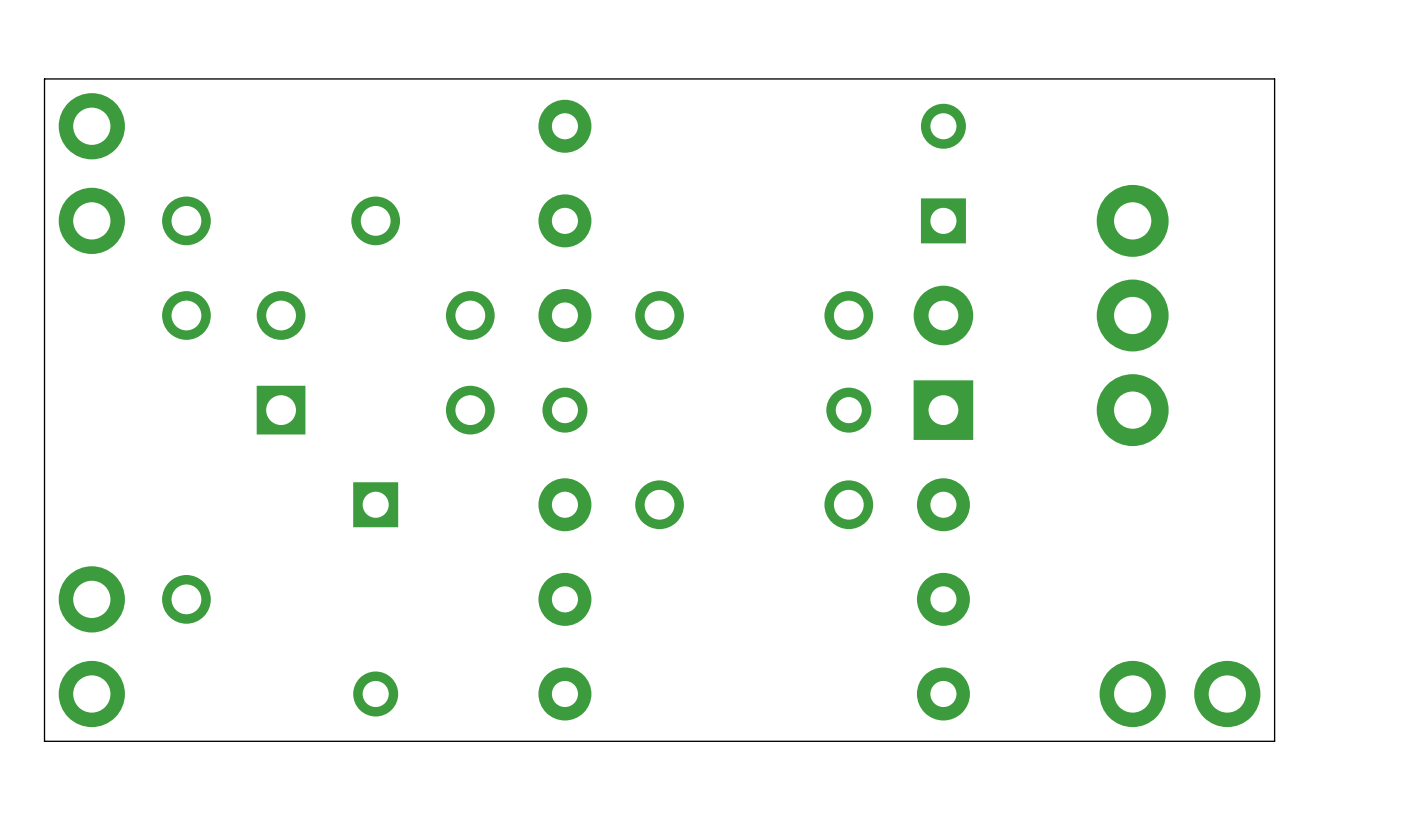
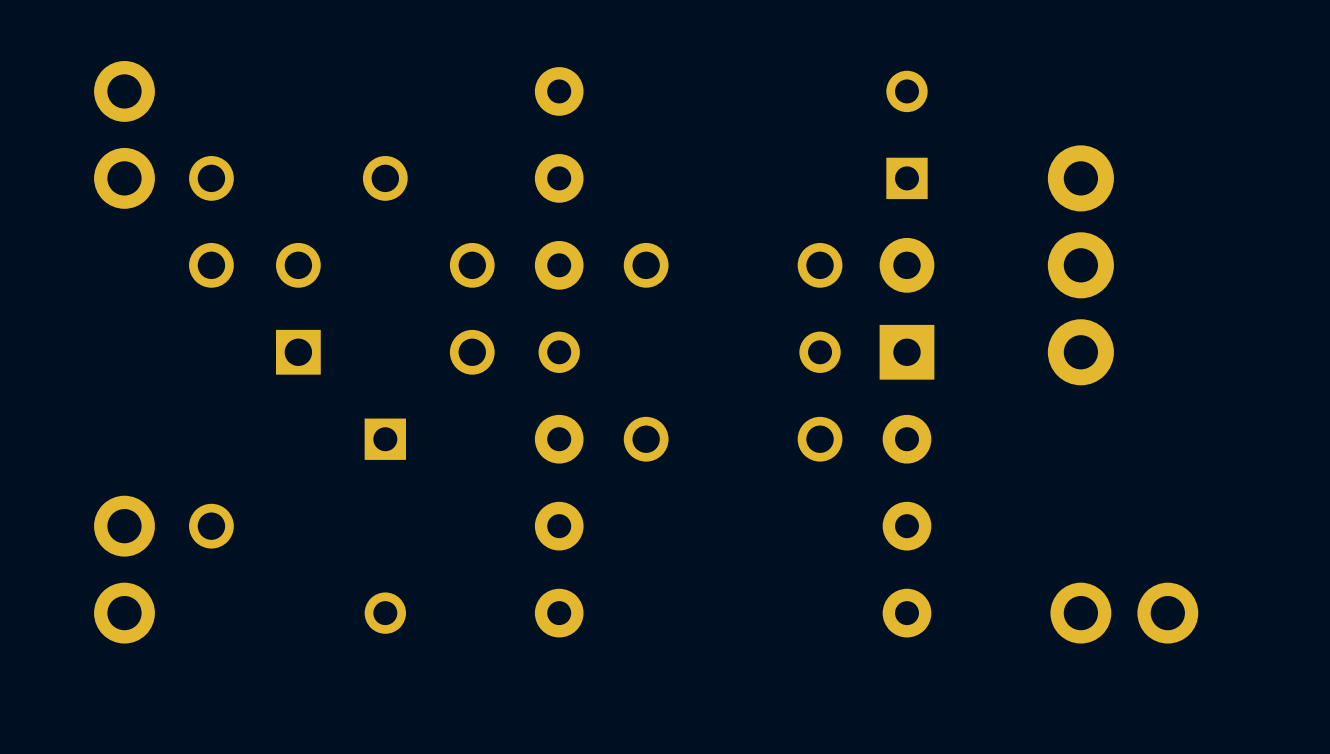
board edge: (1274, 78) (44, 78) (44, 741) (1274, 741) (1274, 78) -> none

